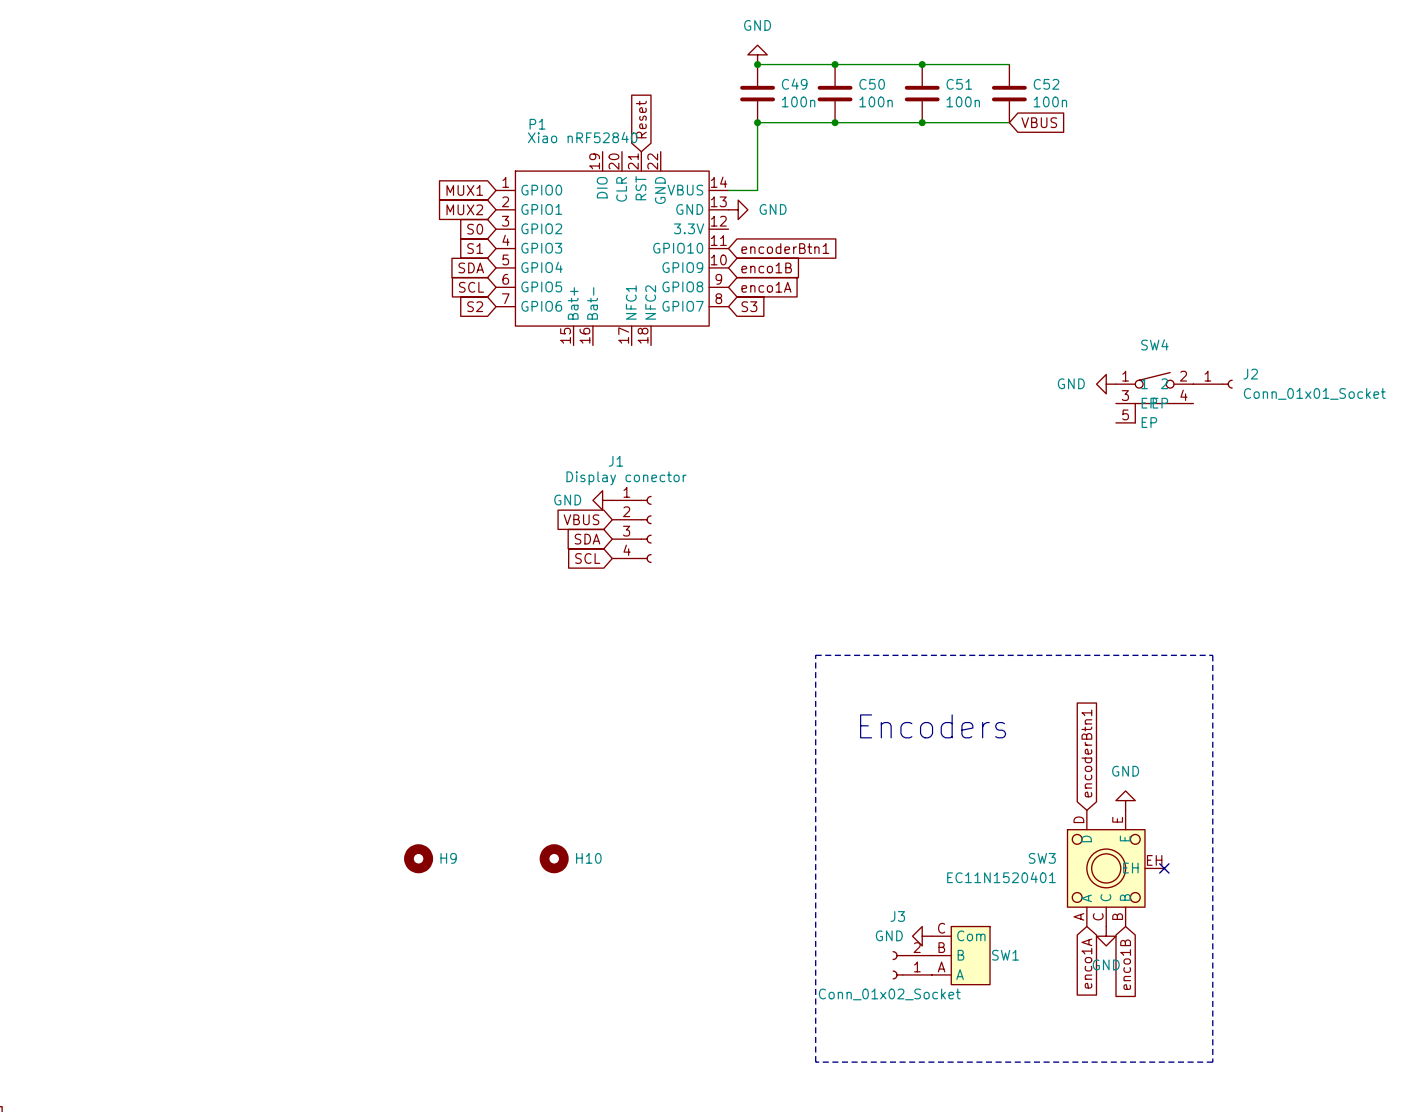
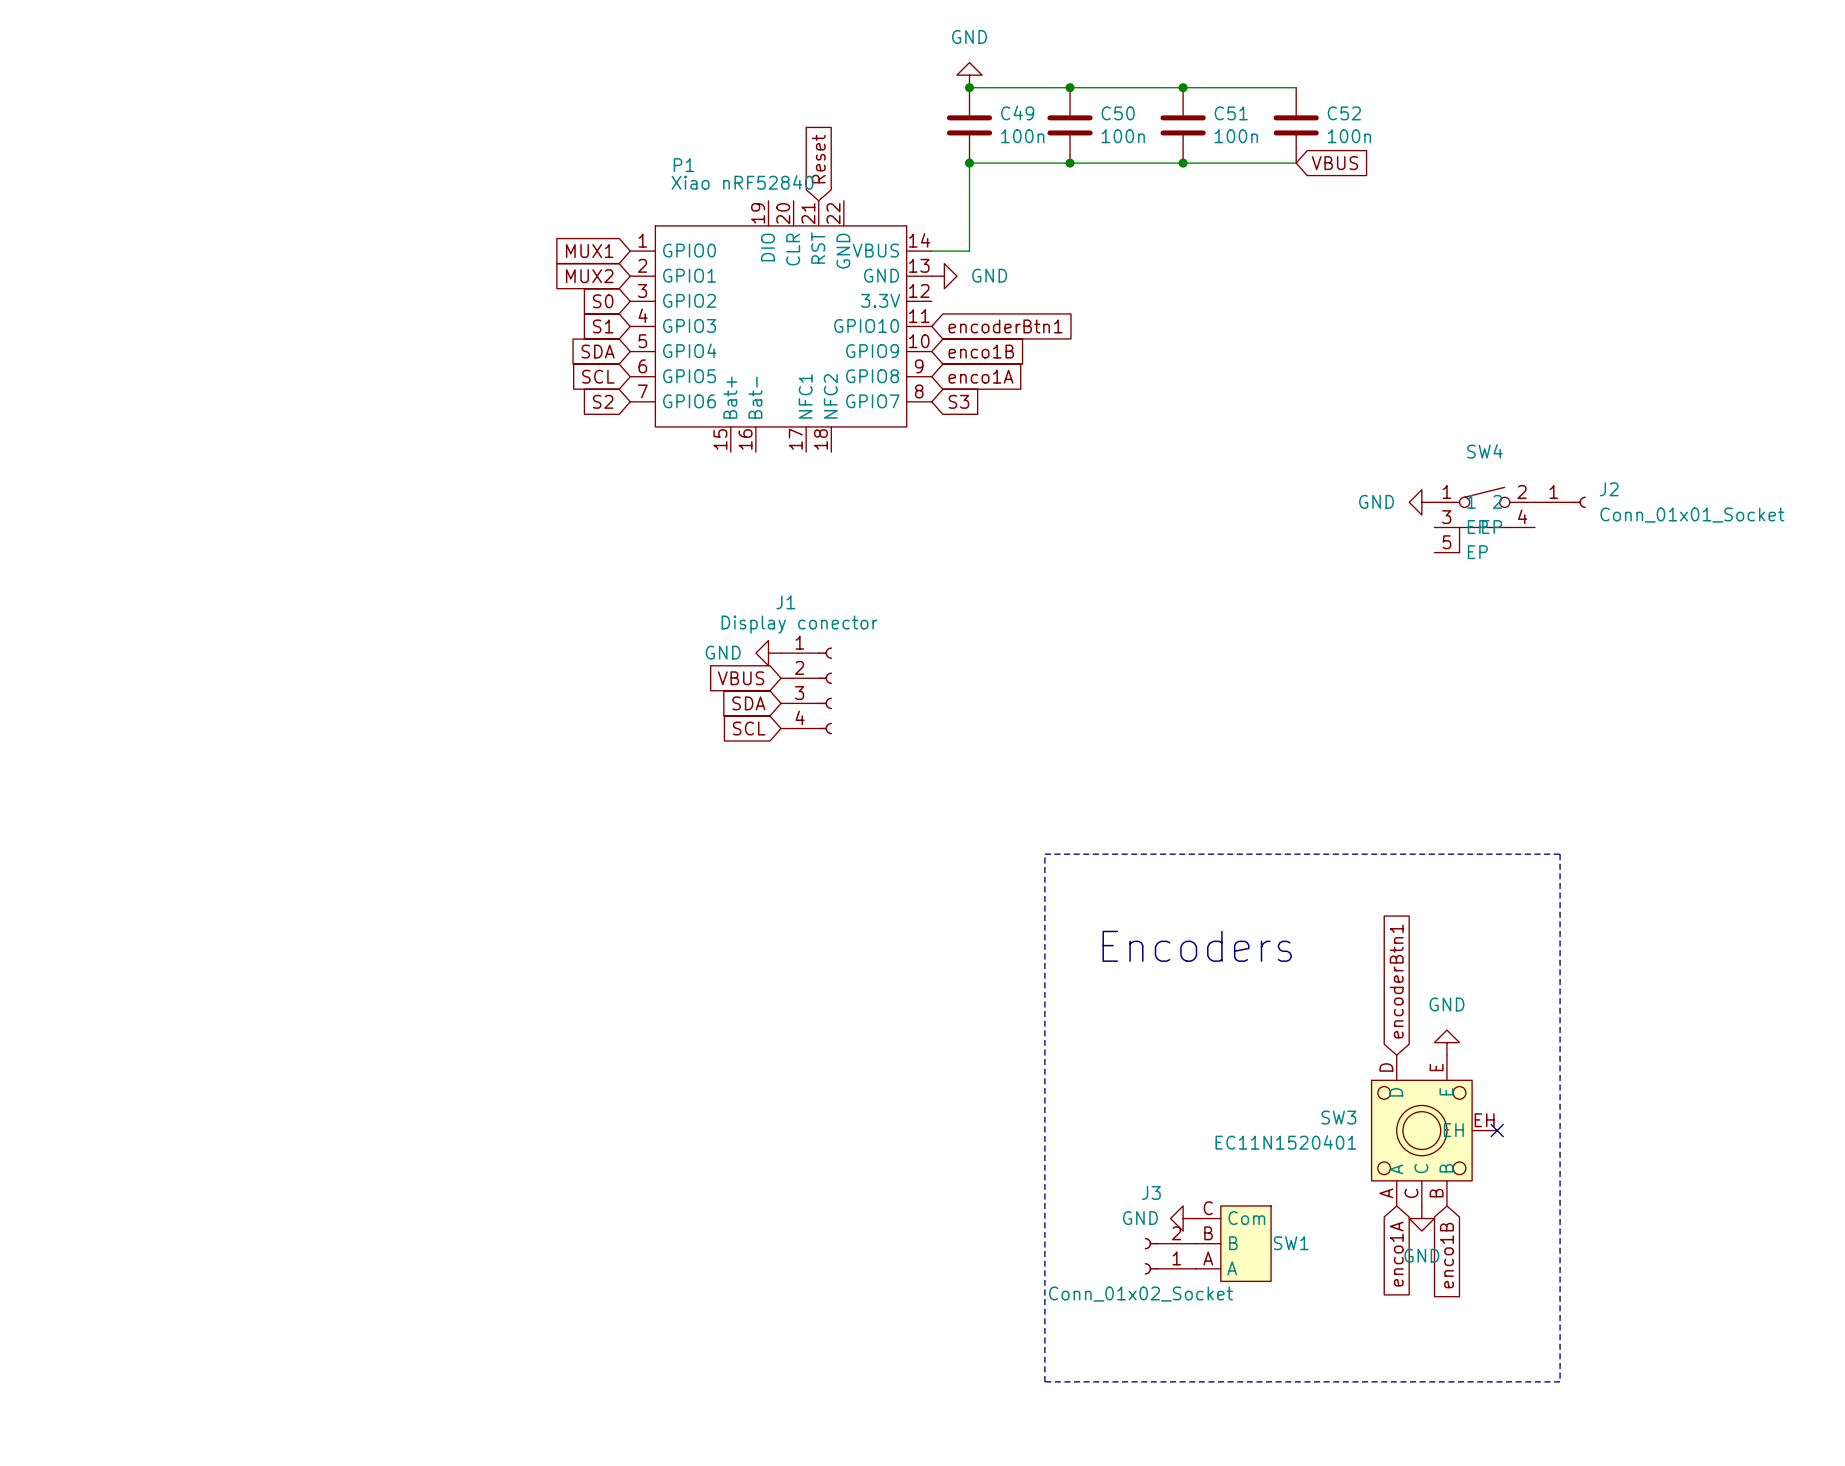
H9: (418, 858) -> none
H10: (554, 858) -> none

